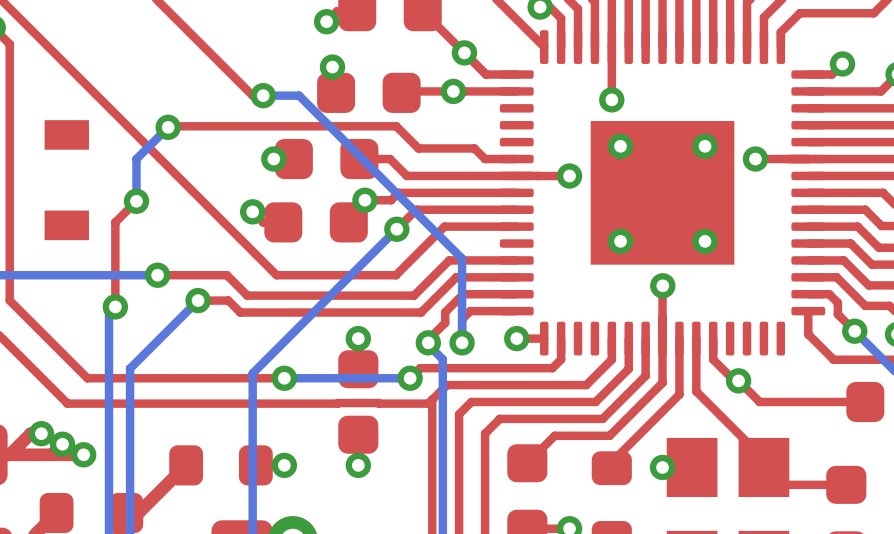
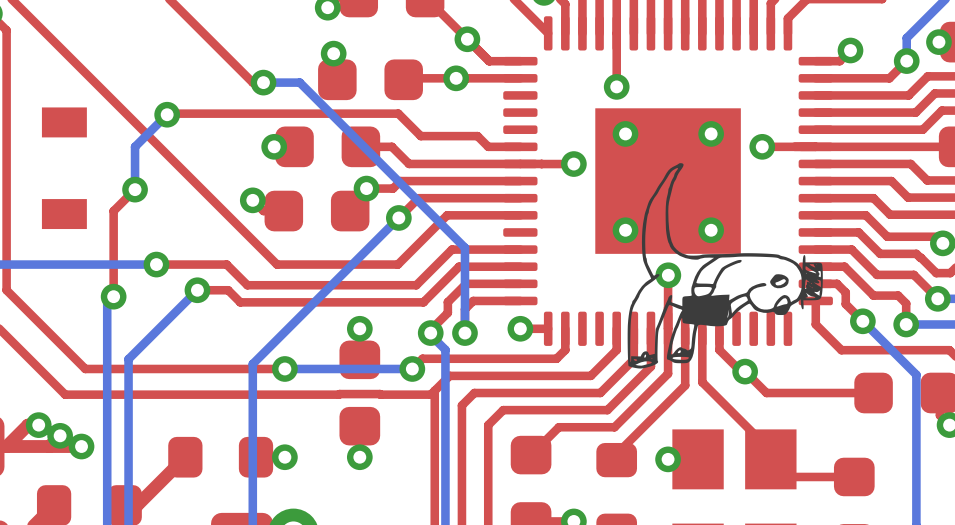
drawing: none -> [627, 163, 823, 369]

